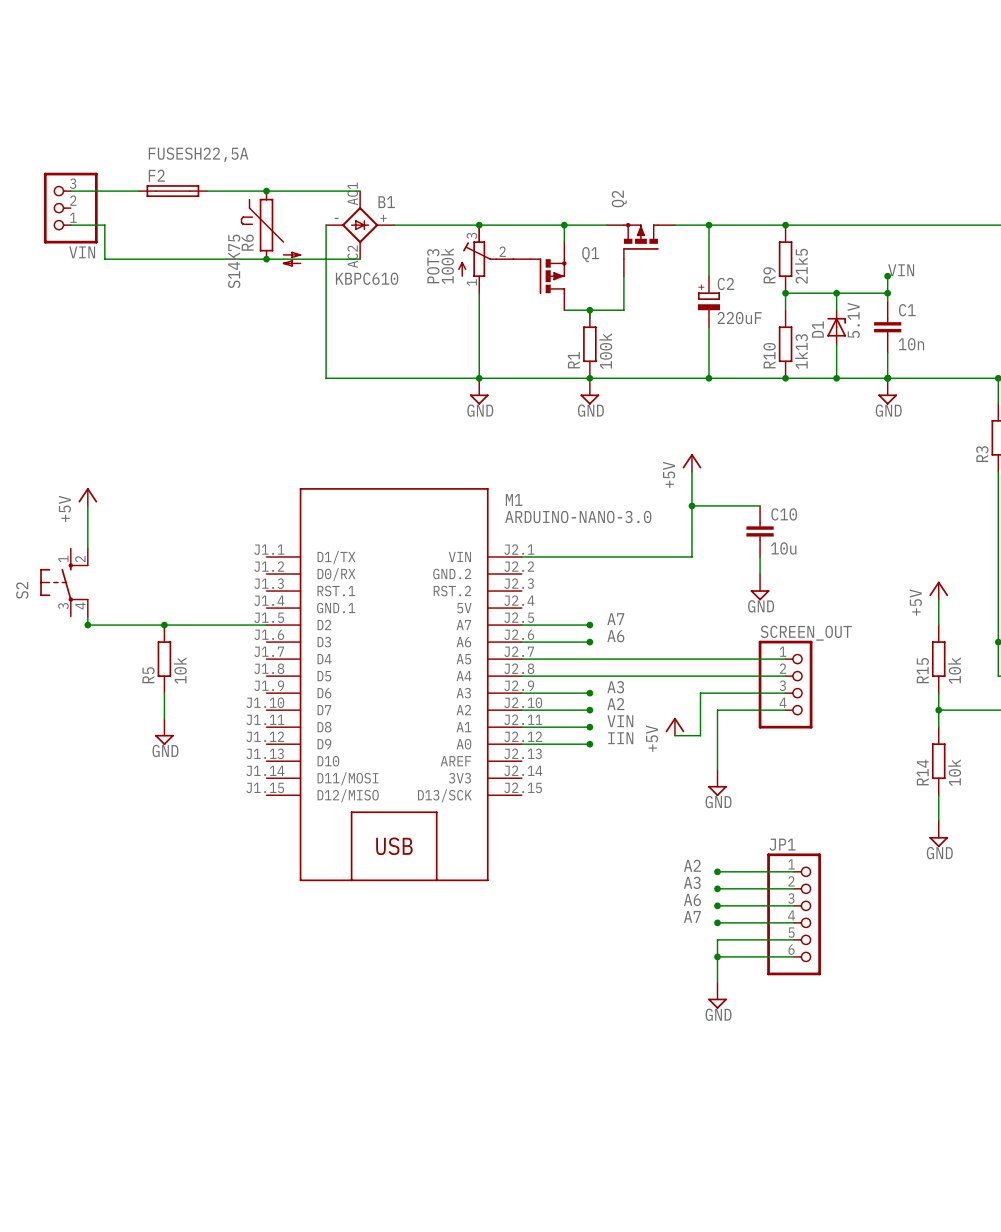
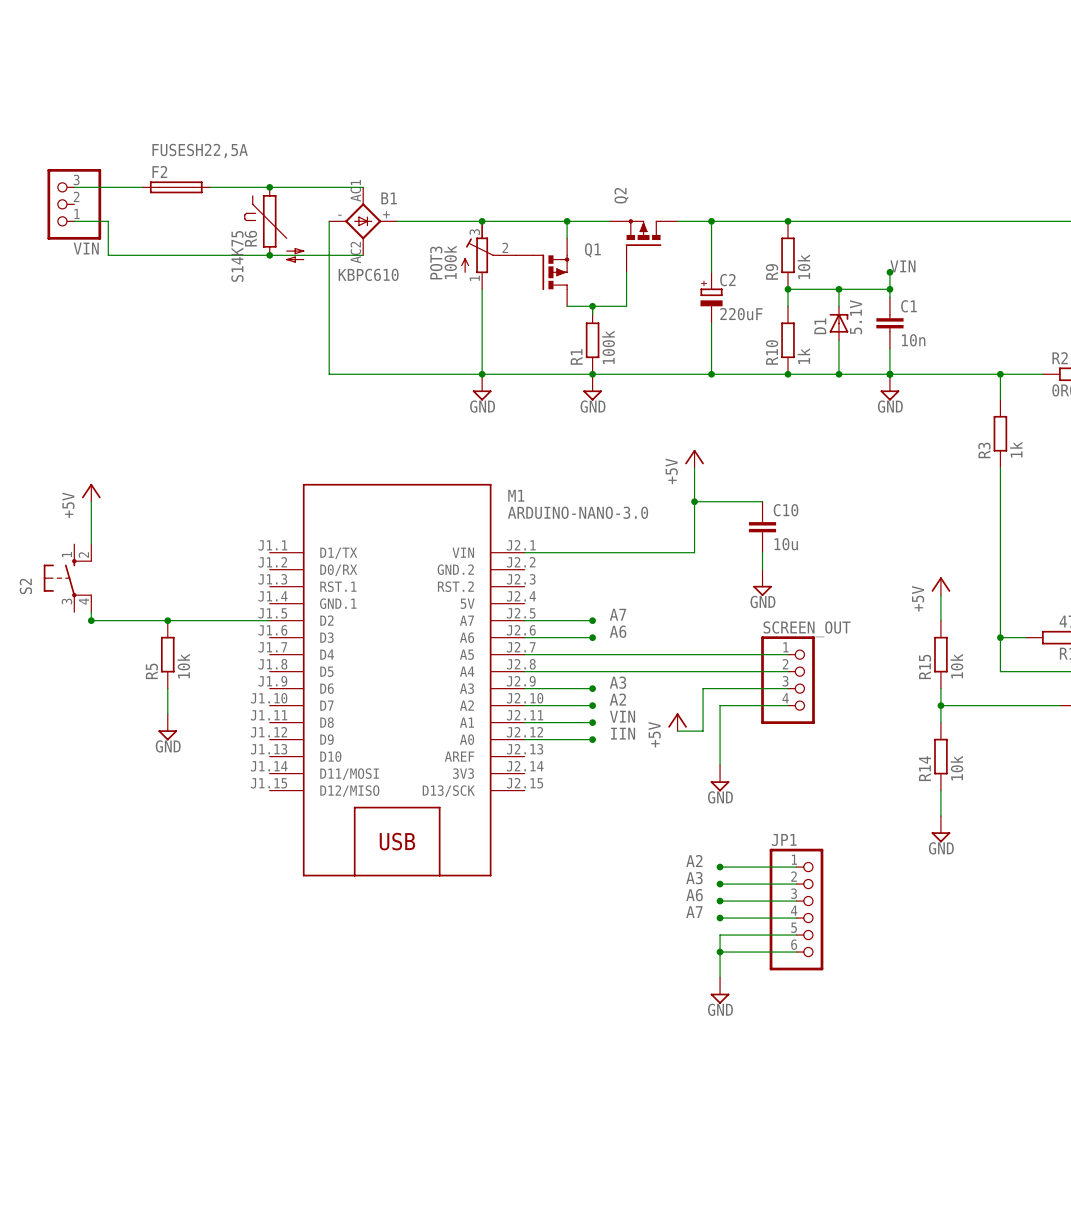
R9 value: 21k5 (801, 266) -> 10k (804, 266)
R10 value: 1k13 (801, 351) -> 1k (803, 356)

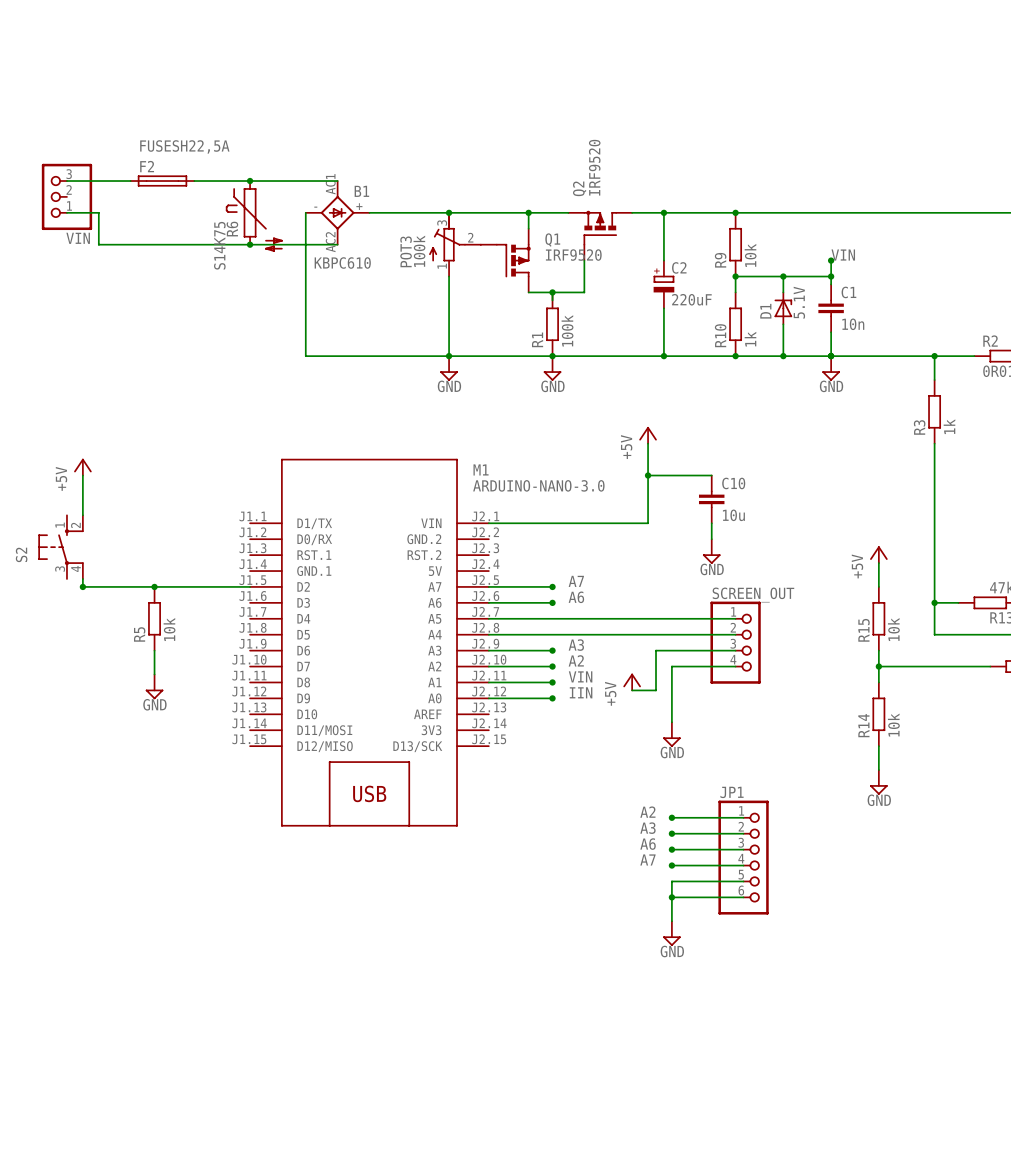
Q2 value: none -> IRF9520 (594, 167)
Q1 value: none -> IRF9520 (573, 255)

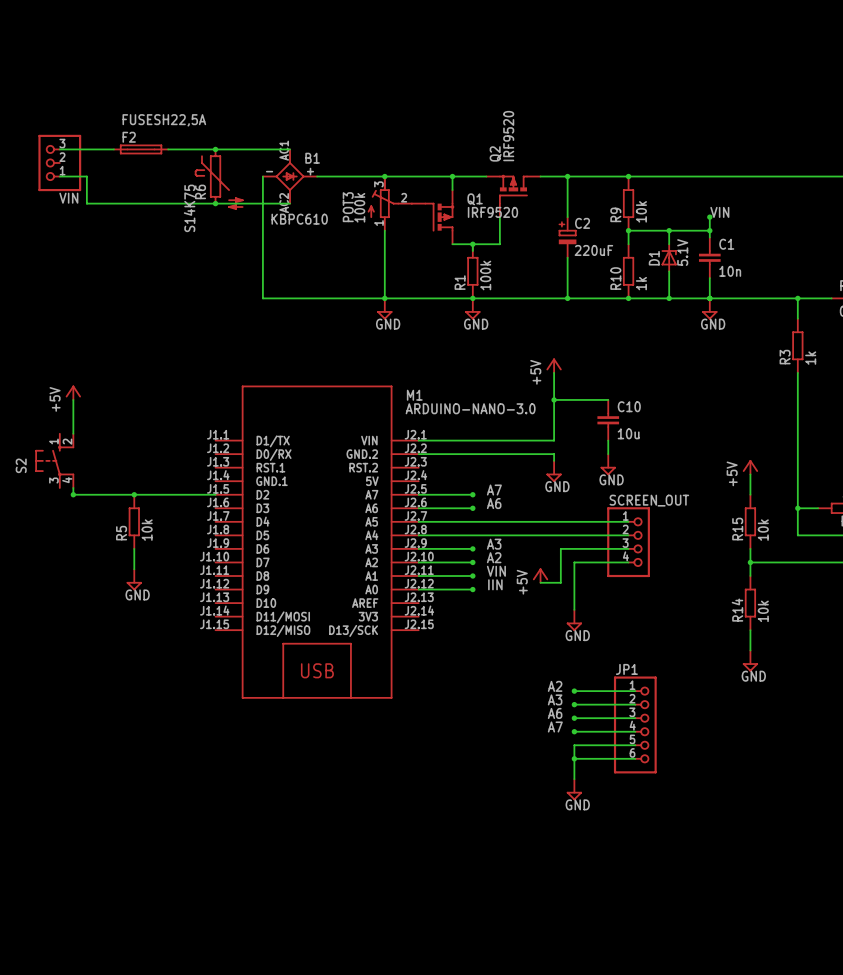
wire: none -> (418, 454) (554, 454) (554, 460)
power symbol: none -> GND (554, 471)

